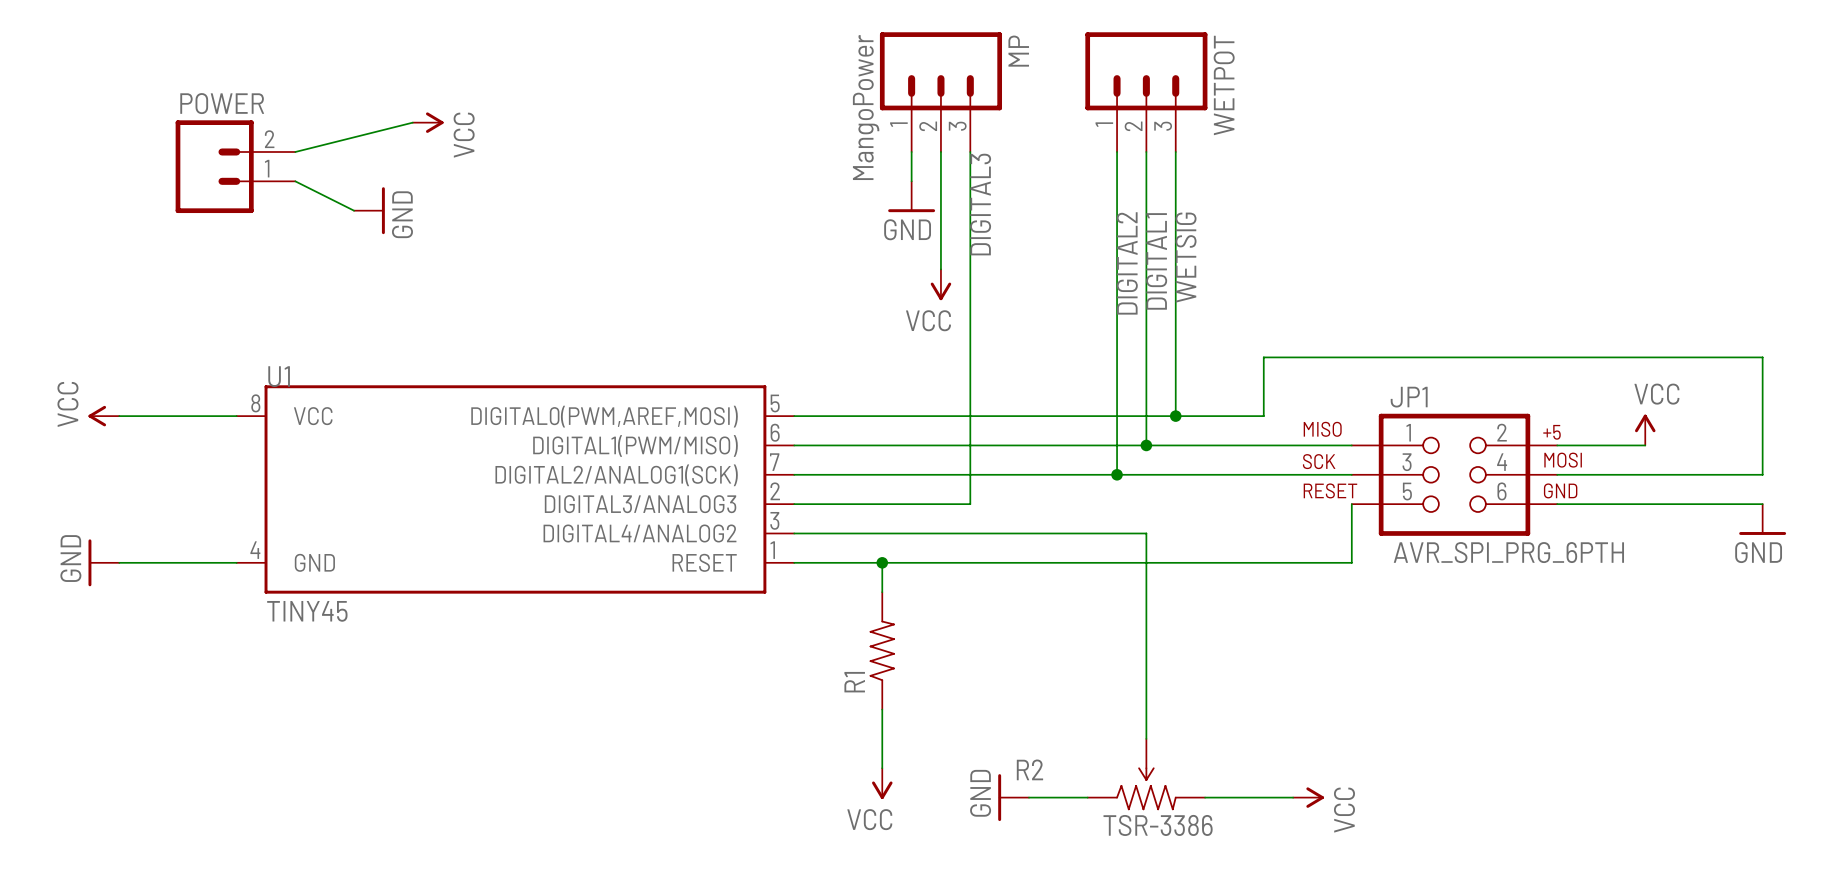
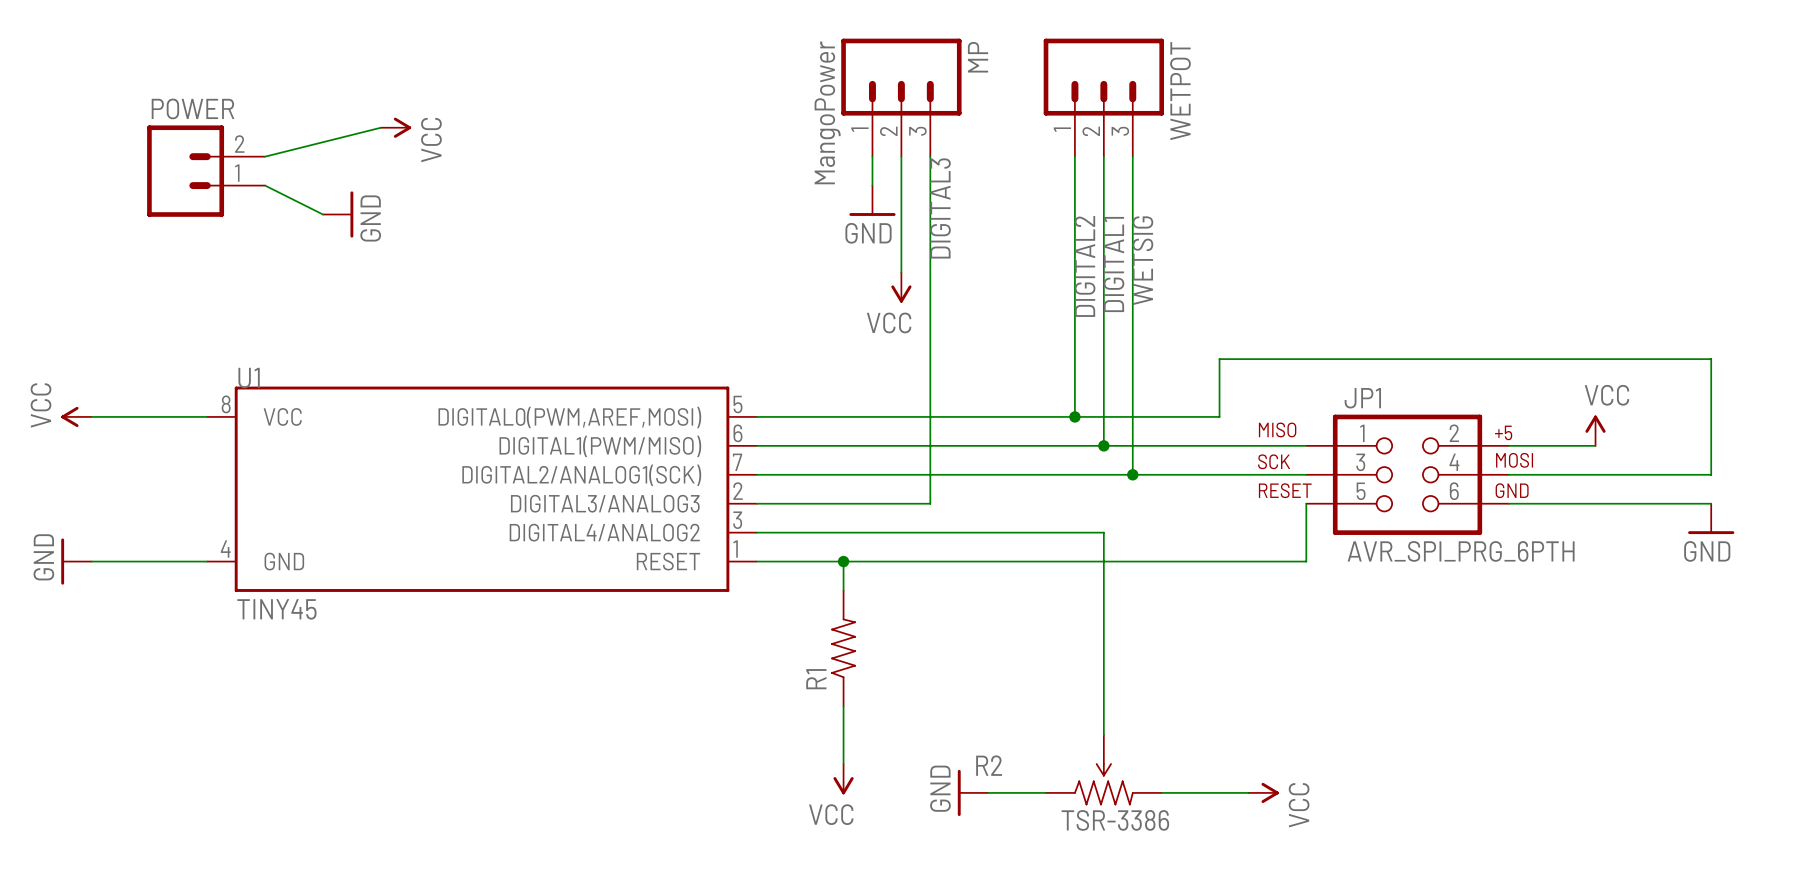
wire: (1117, 416) (1117, 474) -> (1132, 416) (1132, 474)
junction: none -> (1074, 416)
junction: (1175, 416) -> none
junction: (1117, 474) -> none
junction: none -> (1132, 474)

